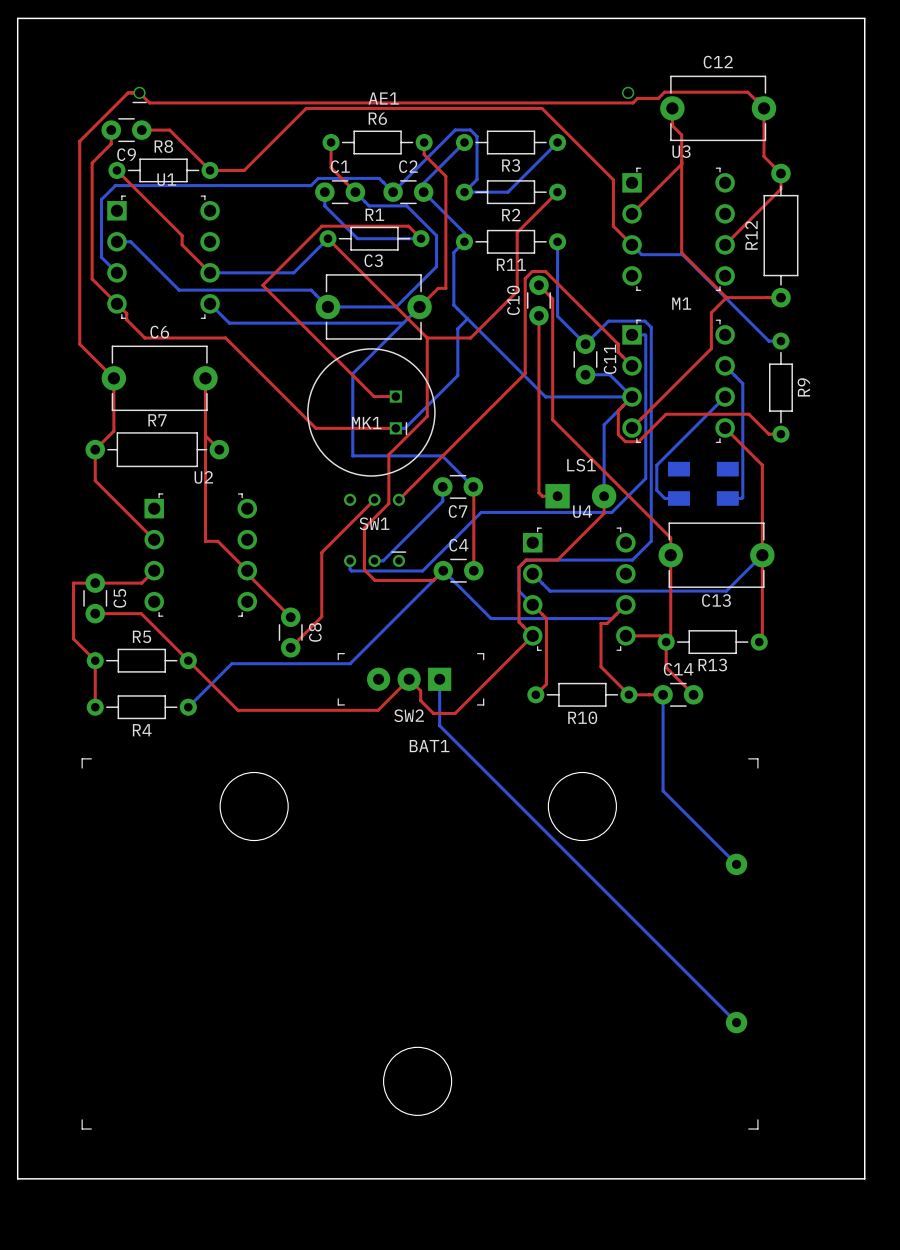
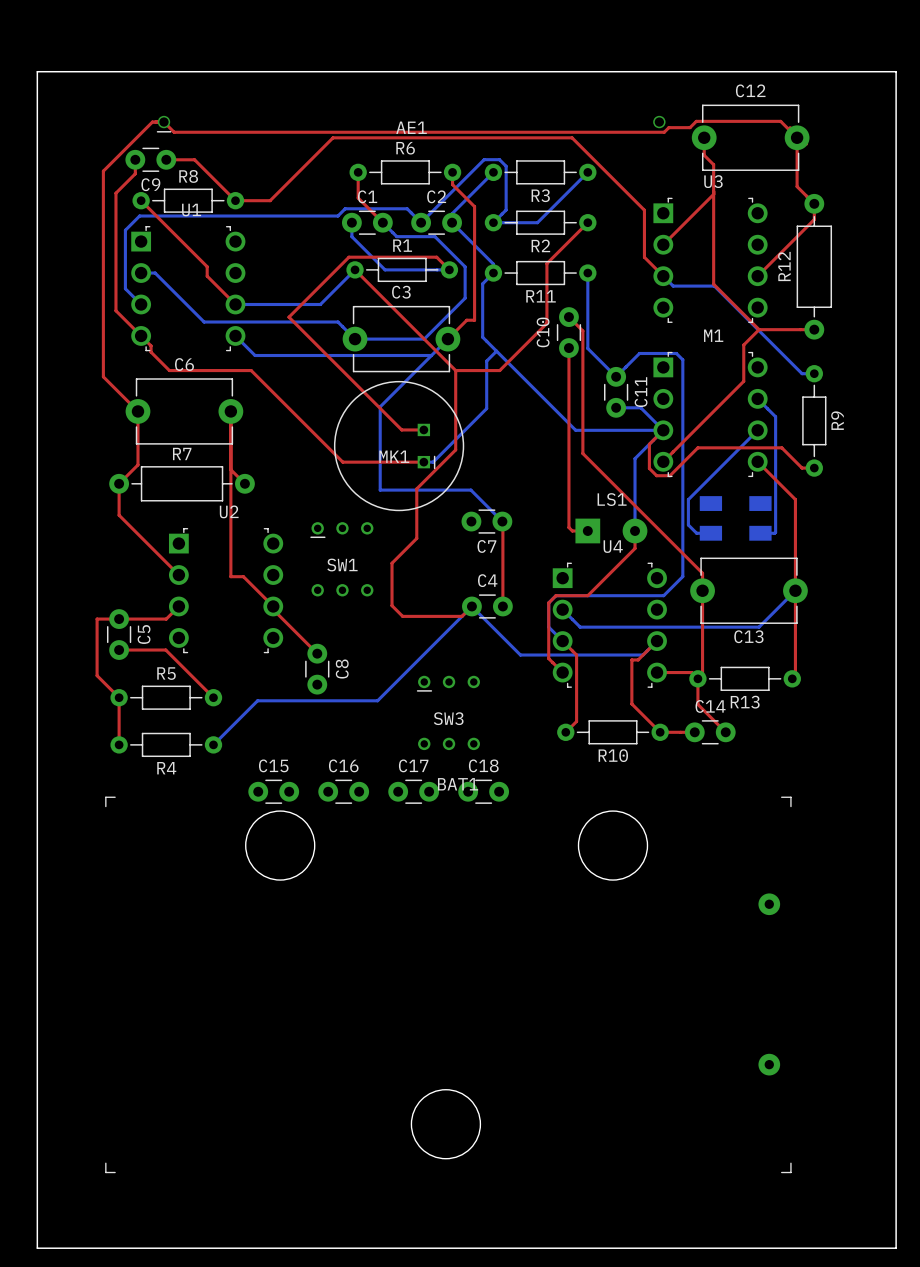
board edge: (17, 18) (864, 18) (864, 1178) (17, 1178) (17, 18) -> (37, 71) (896, 71) (896, 1248) (37, 1248) (37, 71)
bottom track: (632, 334) (645, 335) (645, 478) (611, 512) (481, 512) (422, 570) (351, 570) (350, 560) -> none
top track: (632, 365) (618, 352) (618, 344) (545, 271) (532, 271) (525, 278) (525, 373) (398, 499) -> none
bottom track: (442, 486) (442, 501) (383, 560) (374, 560) -> none
top track: (374, 499) (321, 552) (321, 616) (290, 647) -> none
SW1 rotation: 0° (375, 530) -> 180° (341, 559)
SW1 position: (375, 530) -> (341, 559)
top track: (532, 635) (455, 713) (433, 713) (420, 700) (420, 690) (409, 679) (378, 710) (237, 710) (188, 660) -> none
SW3: none -> (448, 712)
SW2: (410, 679) -> none
bottom track: (439, 679) (439, 725) (736, 1022) -> none
bottom track: (663, 694) (663, 790) (736, 864) -> none
C15: none -> (273, 791)
C16: none -> (343, 791)
C17: none -> (413, 791)
C18: none -> (483, 791)

